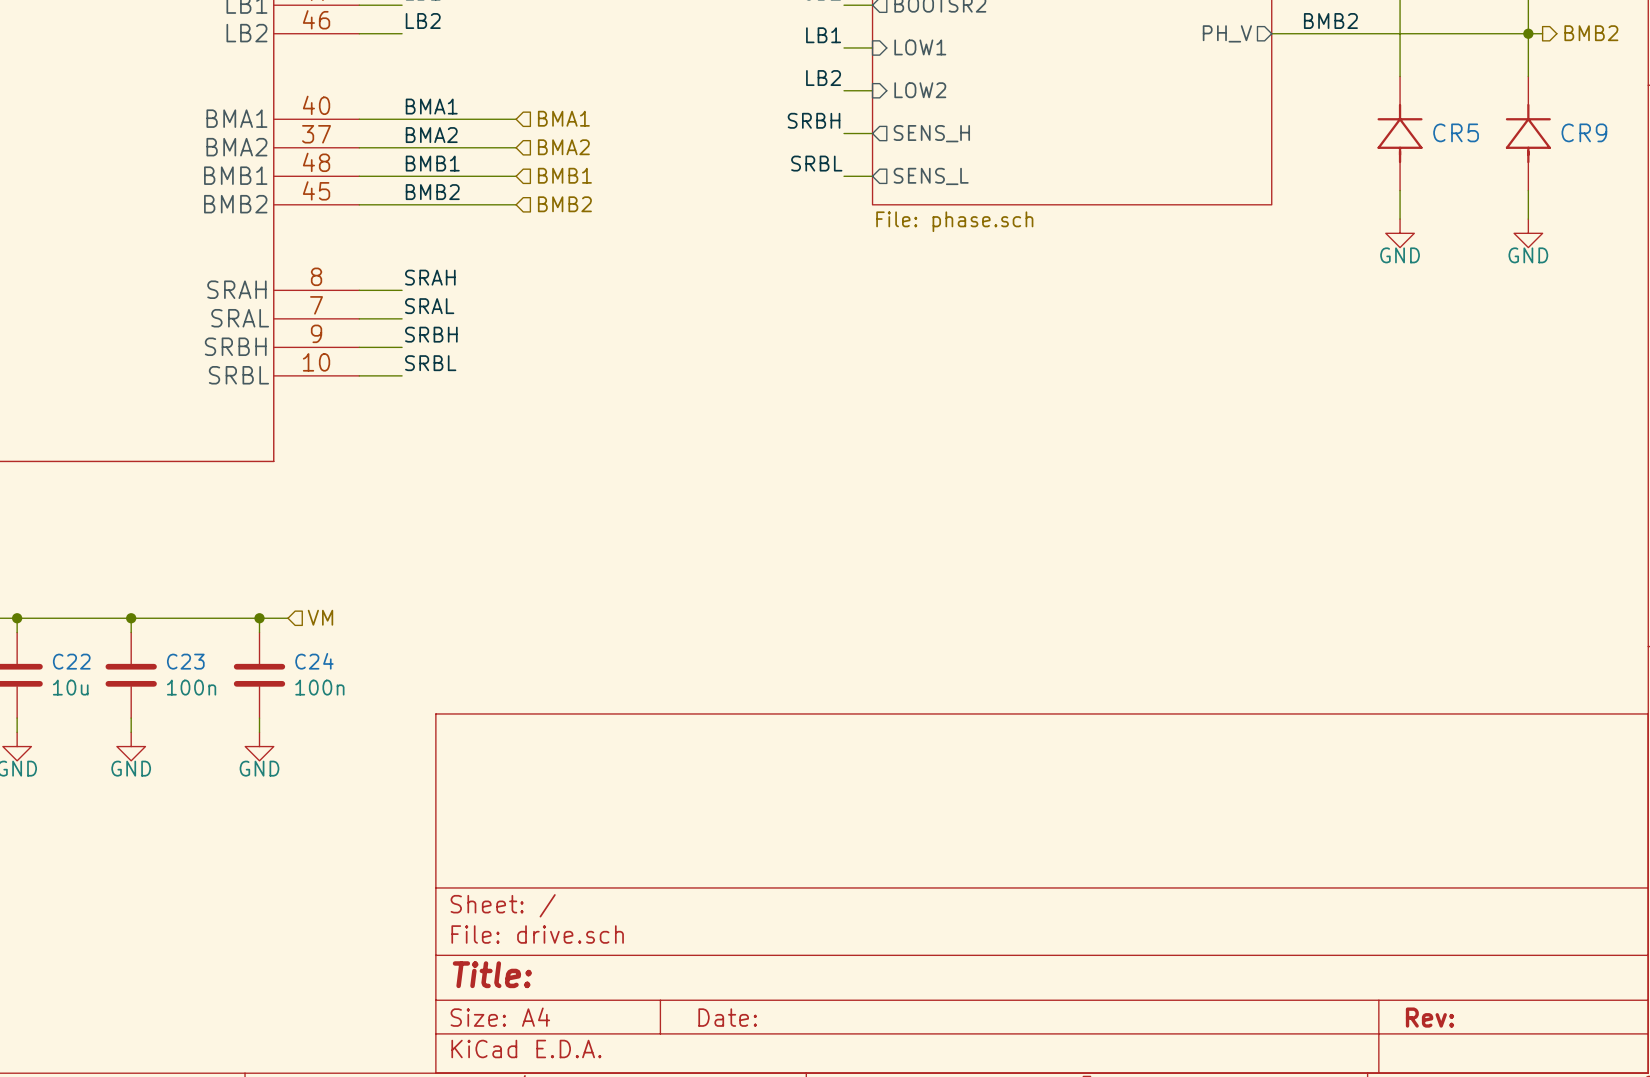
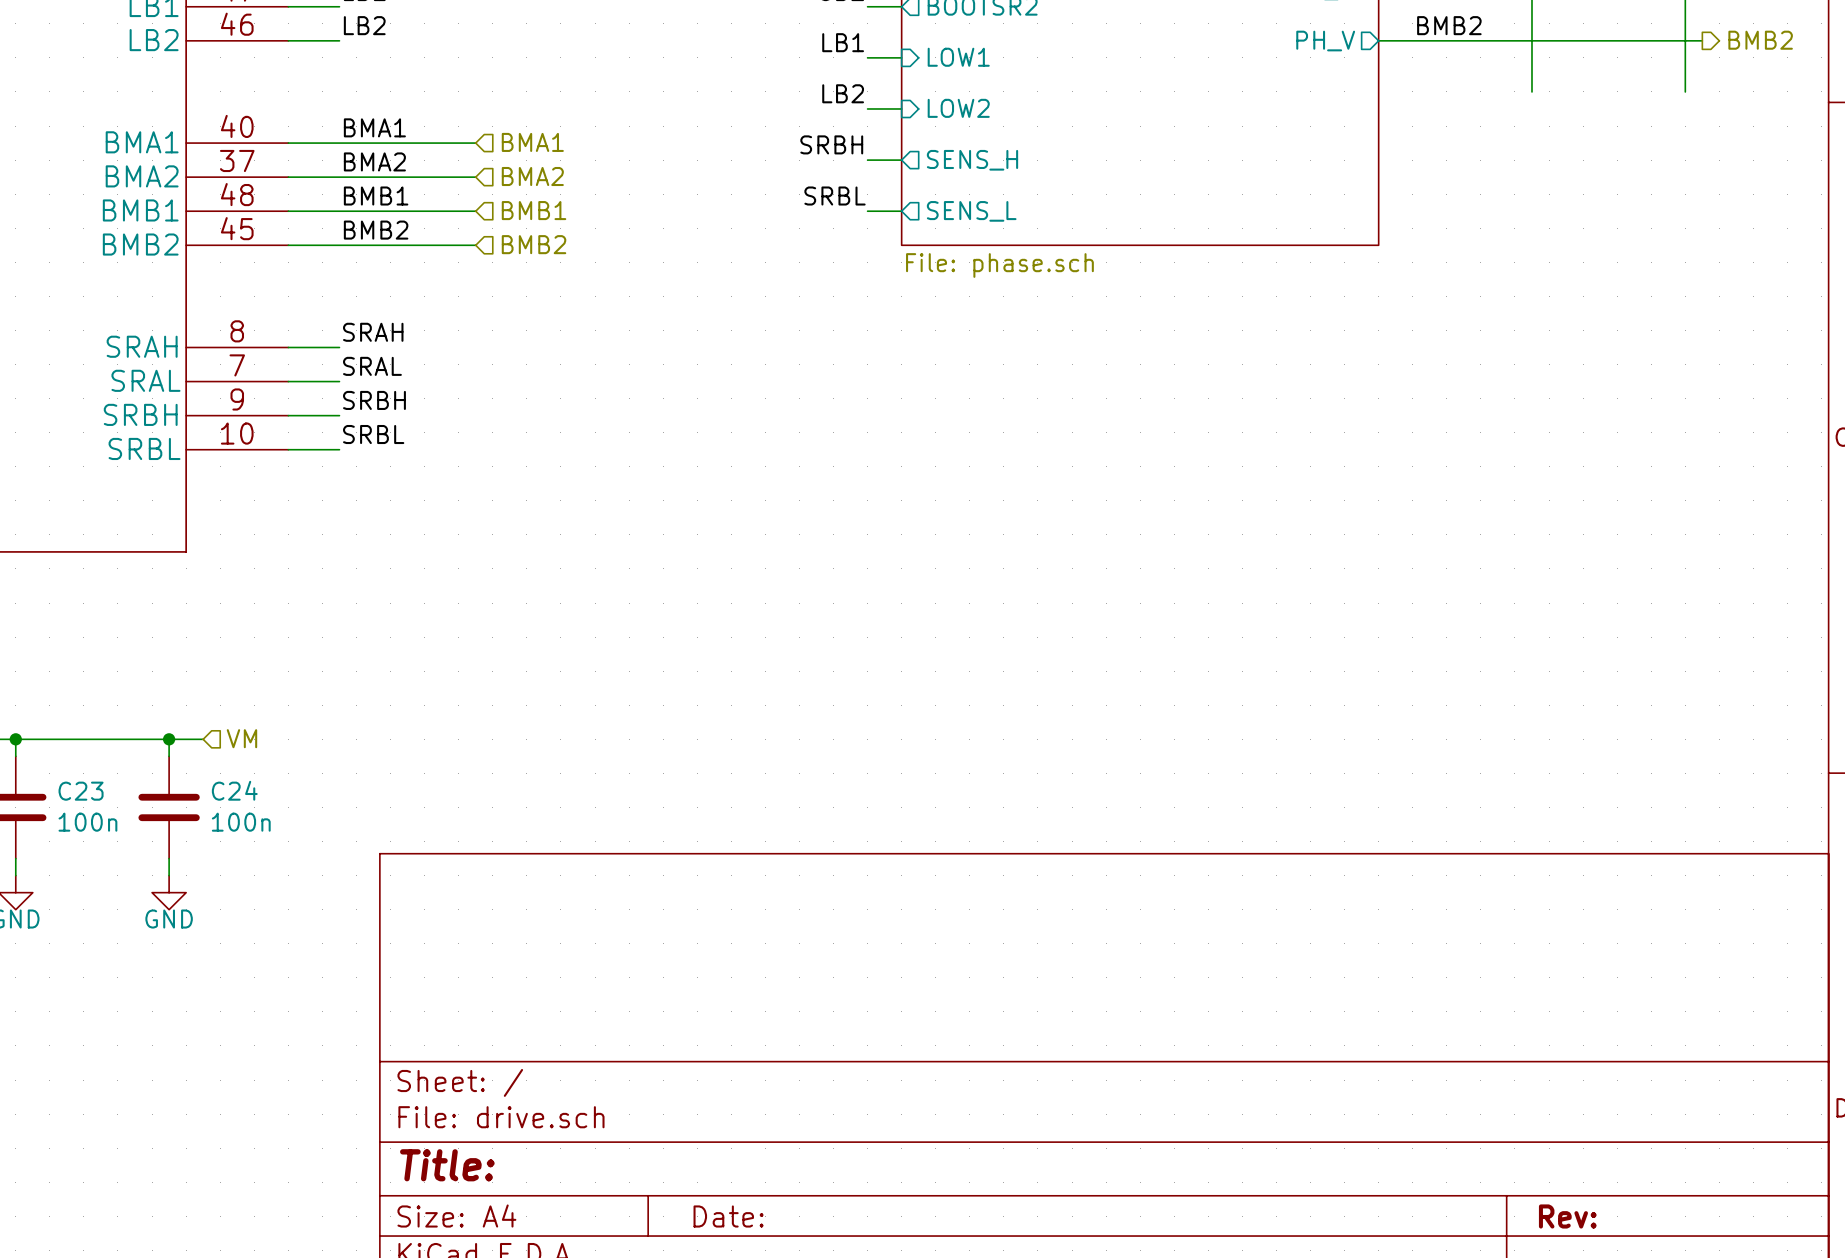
junction: (1528, 33) -> none
CR5: (1400, 133) -> none
CR9: (1528, 133) -> none
wire: (1400, 190) (1400, 219) -> none
wire: (1528, 190) (1528, 219) -> none
power symbol: GND (1400, 233) -> none
power symbol: GND (1528, 233) -> none

